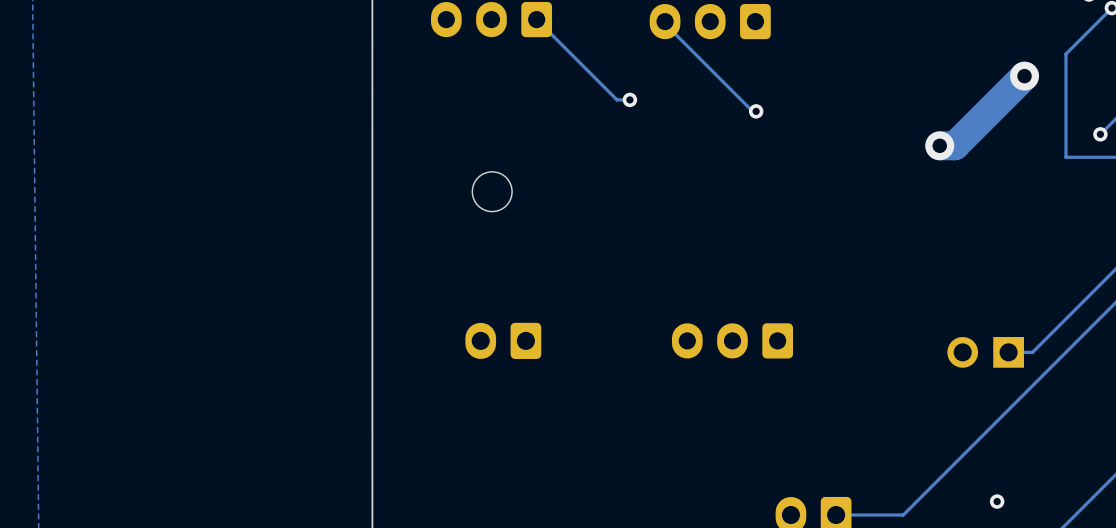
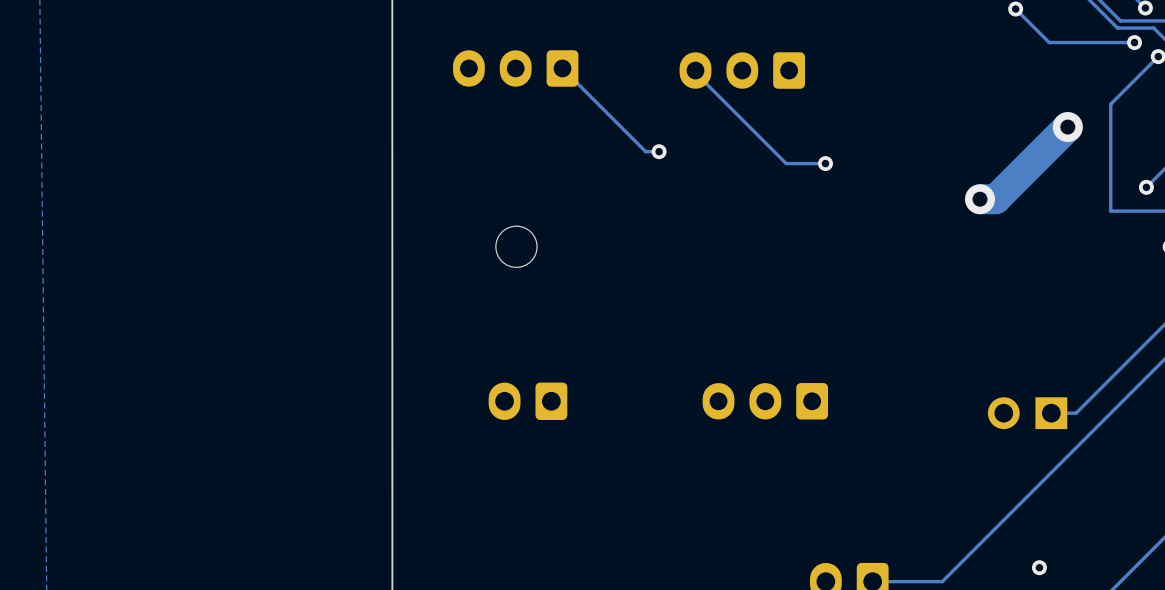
via position: (756, 111) -> (825, 163)
track: none -> (825, 163) (789, 163)

